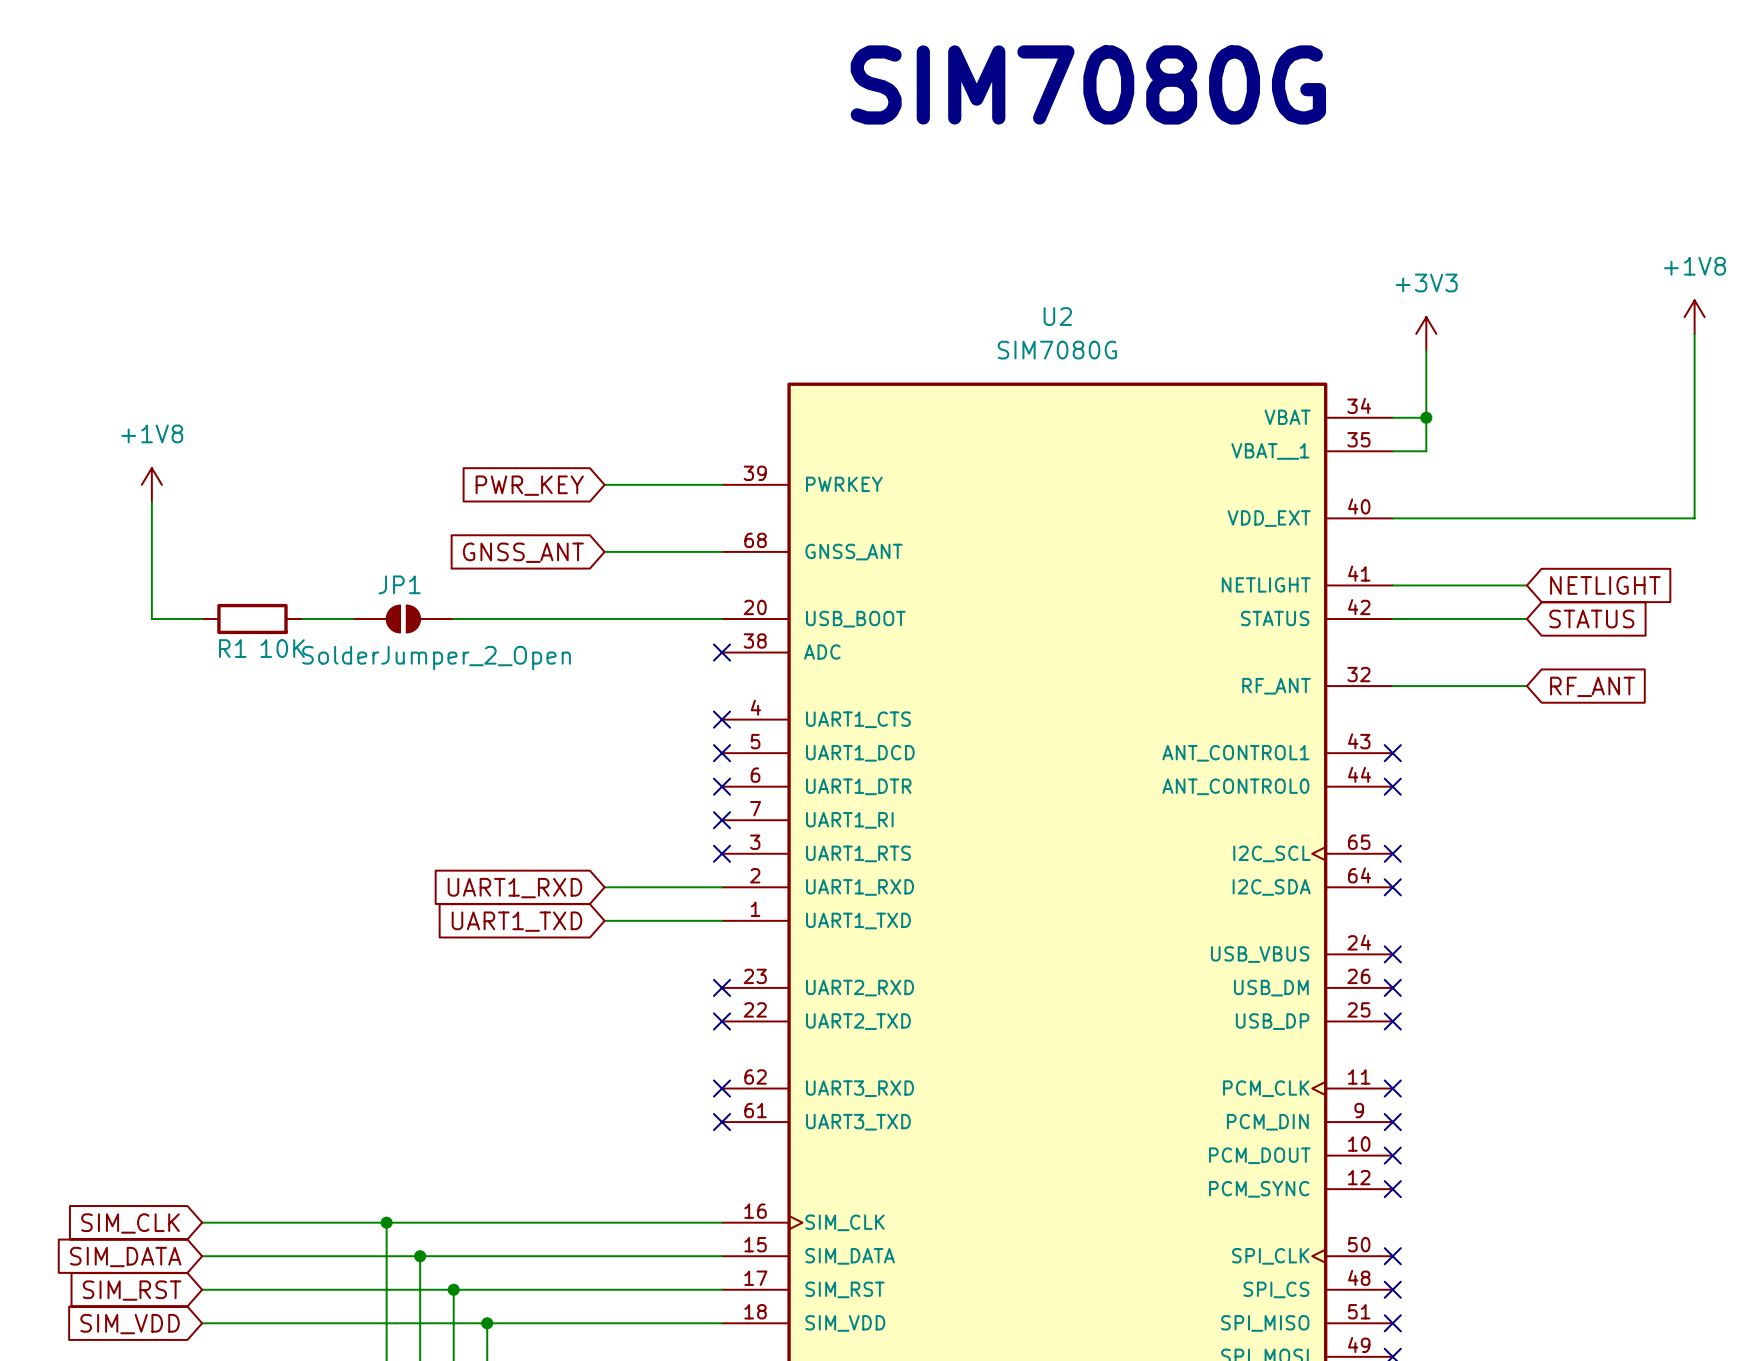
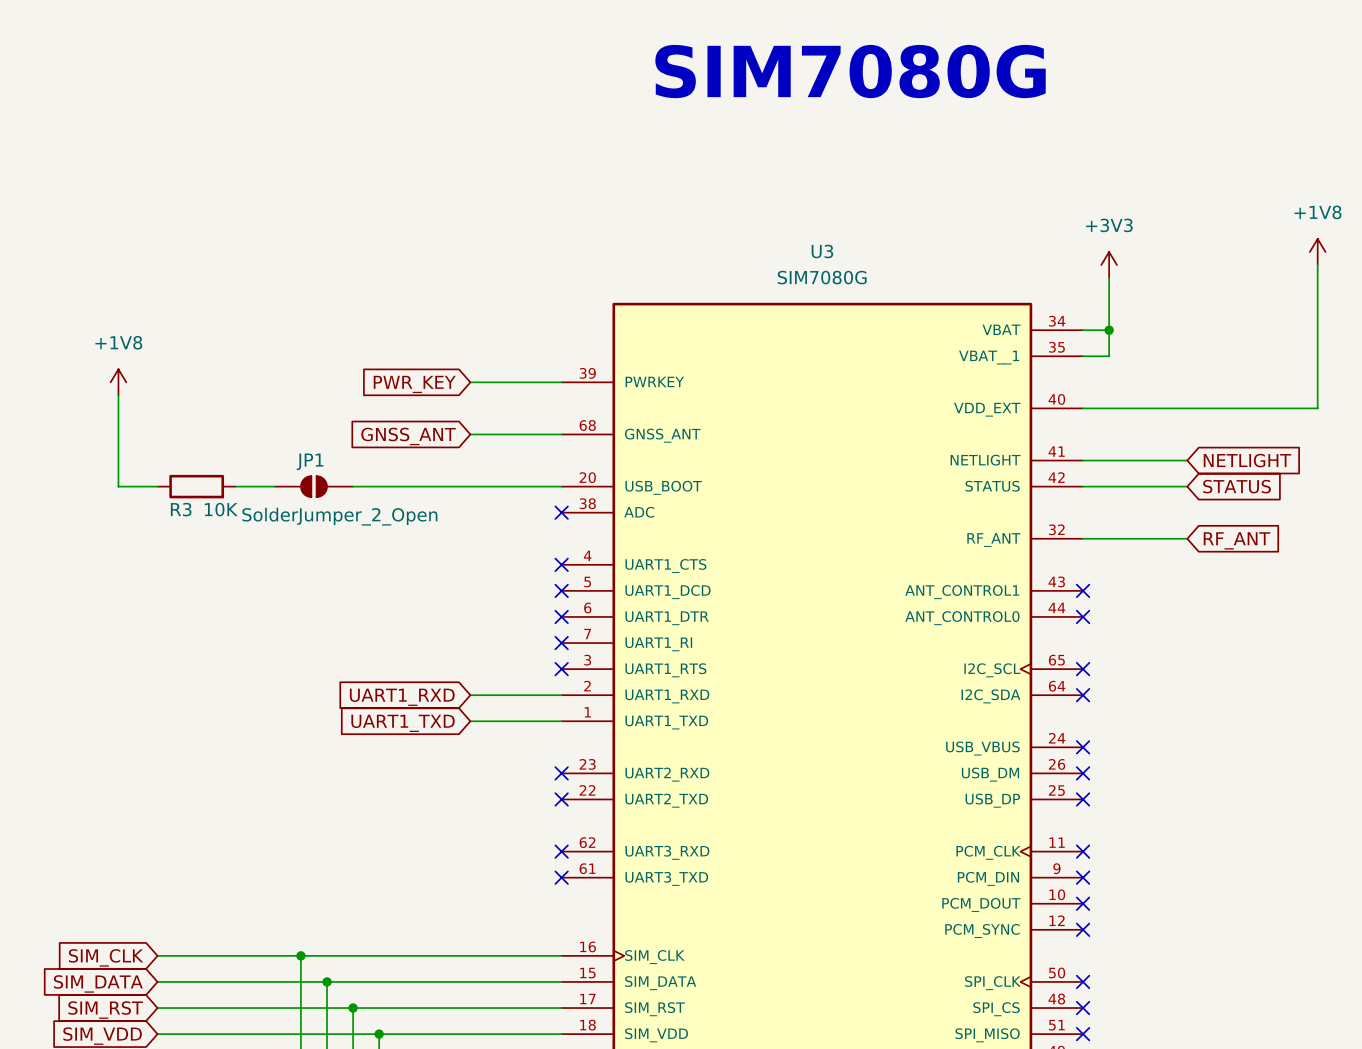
U2 name: U2 (1057, 316) -> U3 (822, 251)
R1 name: R1 (232, 648) -> R3 (181, 509)

